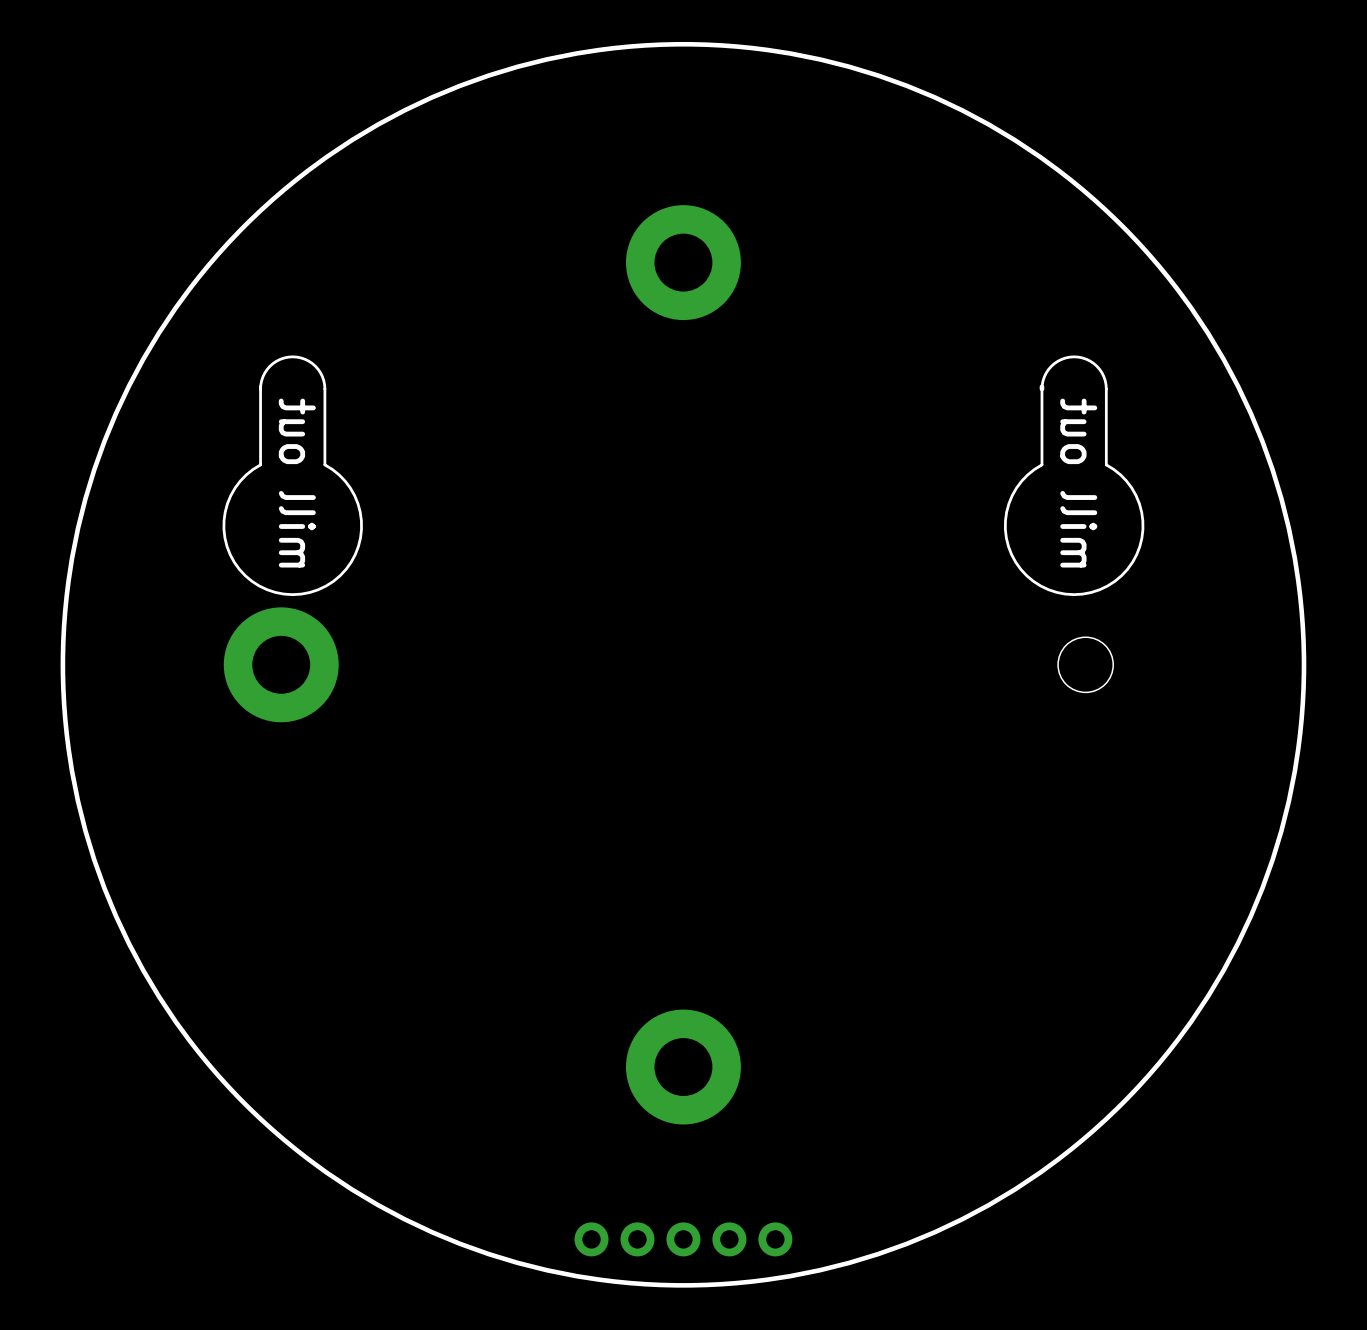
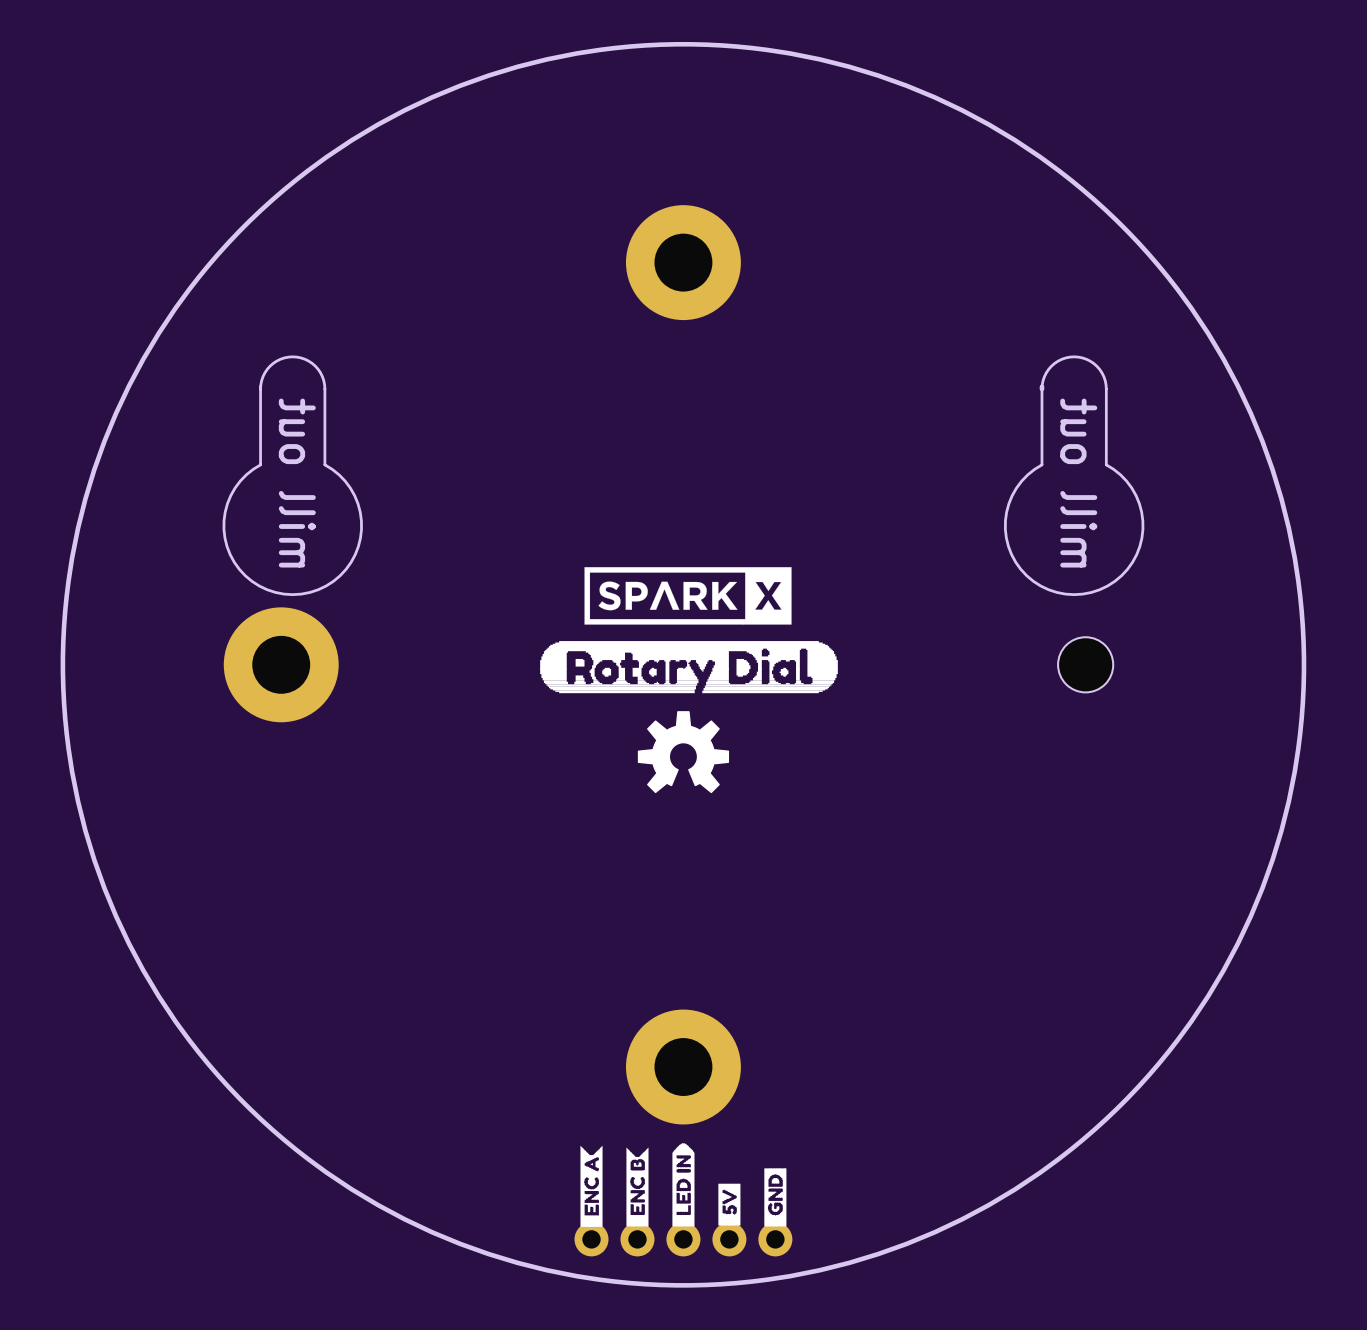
drawing: none -> [540, 567, 838, 794]
drawing: none -> [672, 1143, 695, 1227]
drawing: none -> [580, 1145, 603, 1227]
drawing: none -> [626, 1147, 649, 1227]
drawing: none -> [764, 1168, 787, 1227]
drawing: none -> [718, 1183, 741, 1226]

